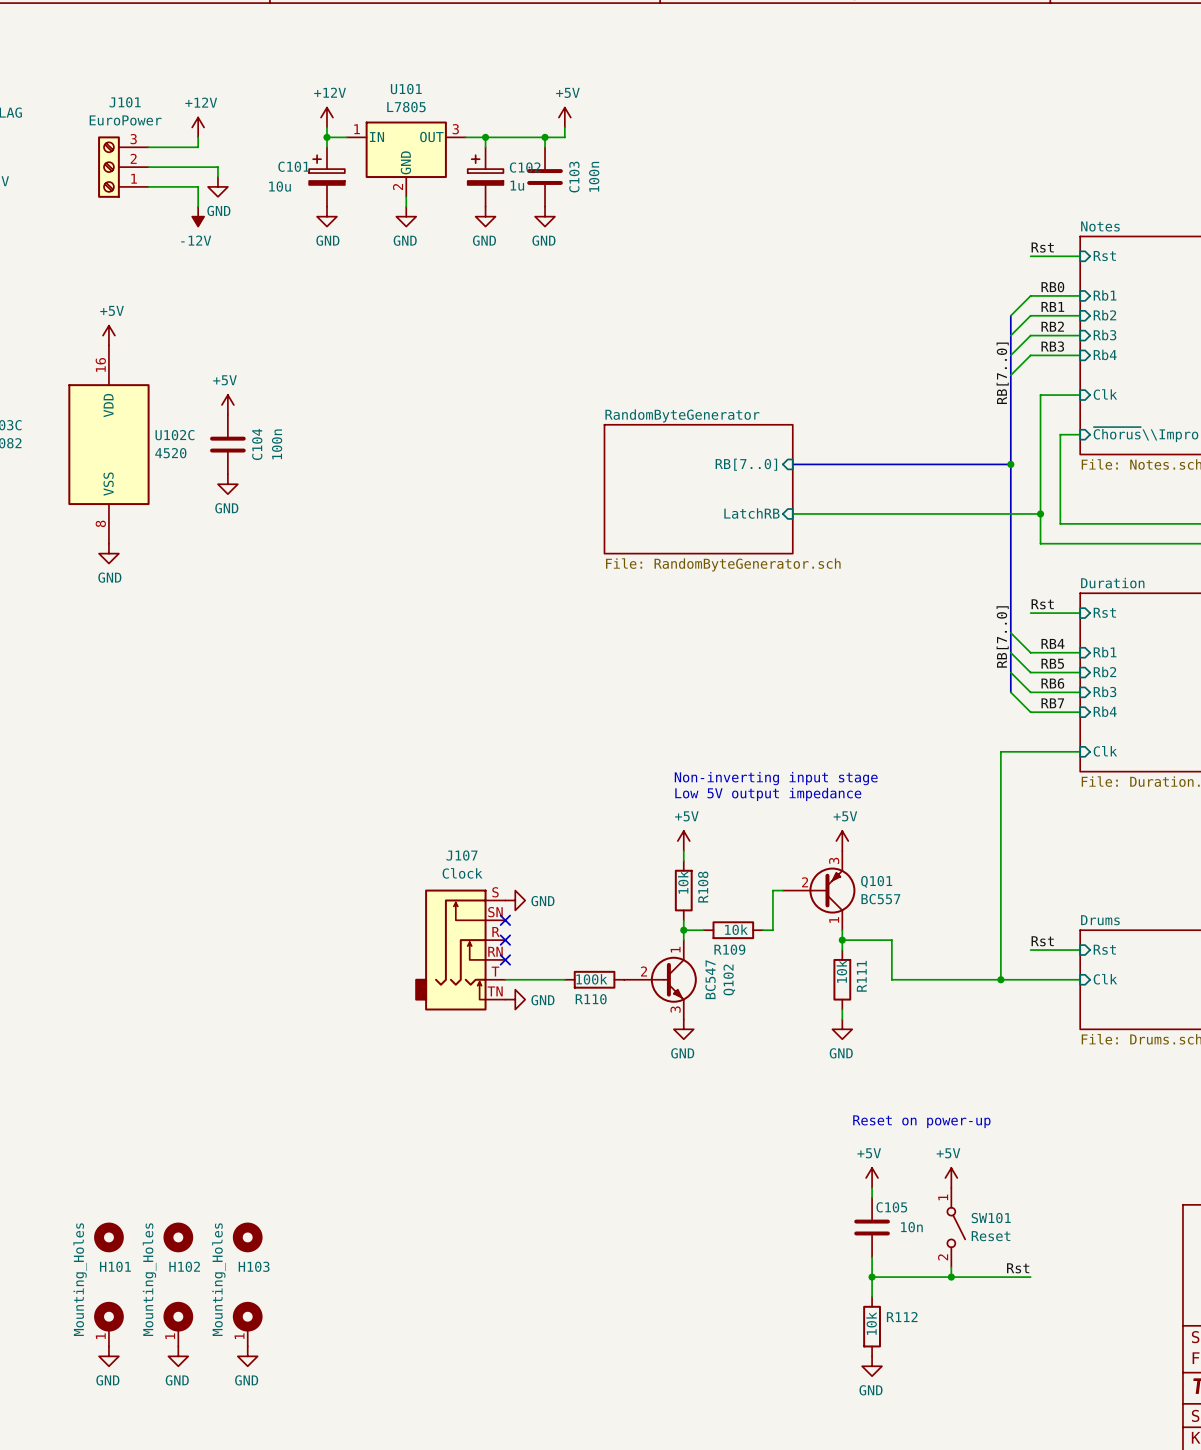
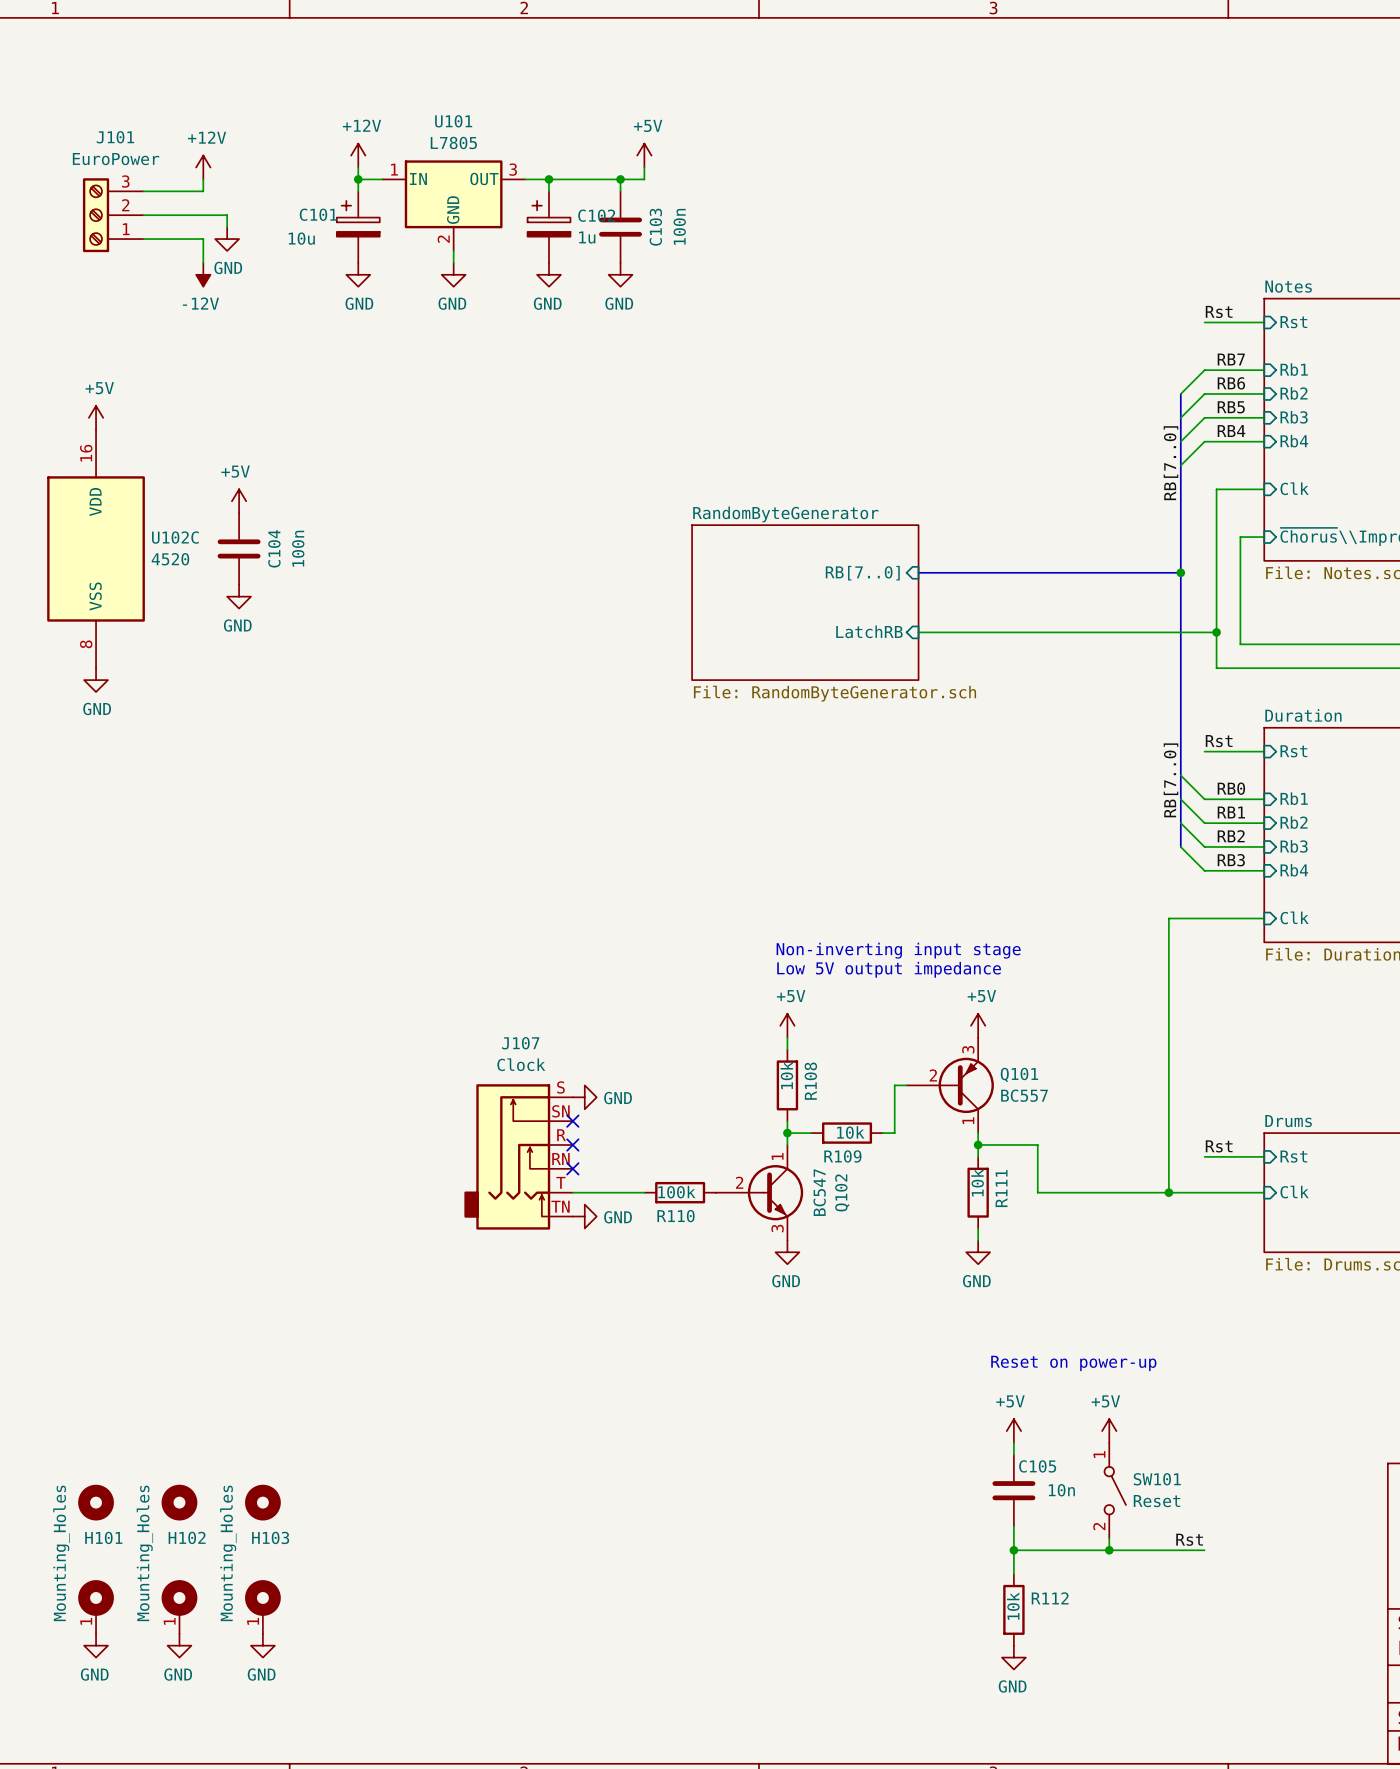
label: RB0 (1052, 287) -> RB7 (1231, 359)
label: RB1 (1052, 306) -> RB6 (1231, 383)
label: RB2 (1052, 326) -> RB5 (1231, 407)
label: RB3 (1052, 346) -> RB4 (1231, 431)
label: RB4 (1052, 643) -> RB0 (1231, 788)
label: RB5 (1052, 663) -> RB1 (1231, 812)
label: RB6 (1052, 683) -> RB2 (1231, 836)
label: RB7 (1052, 703) -> RB3 (1231, 860)

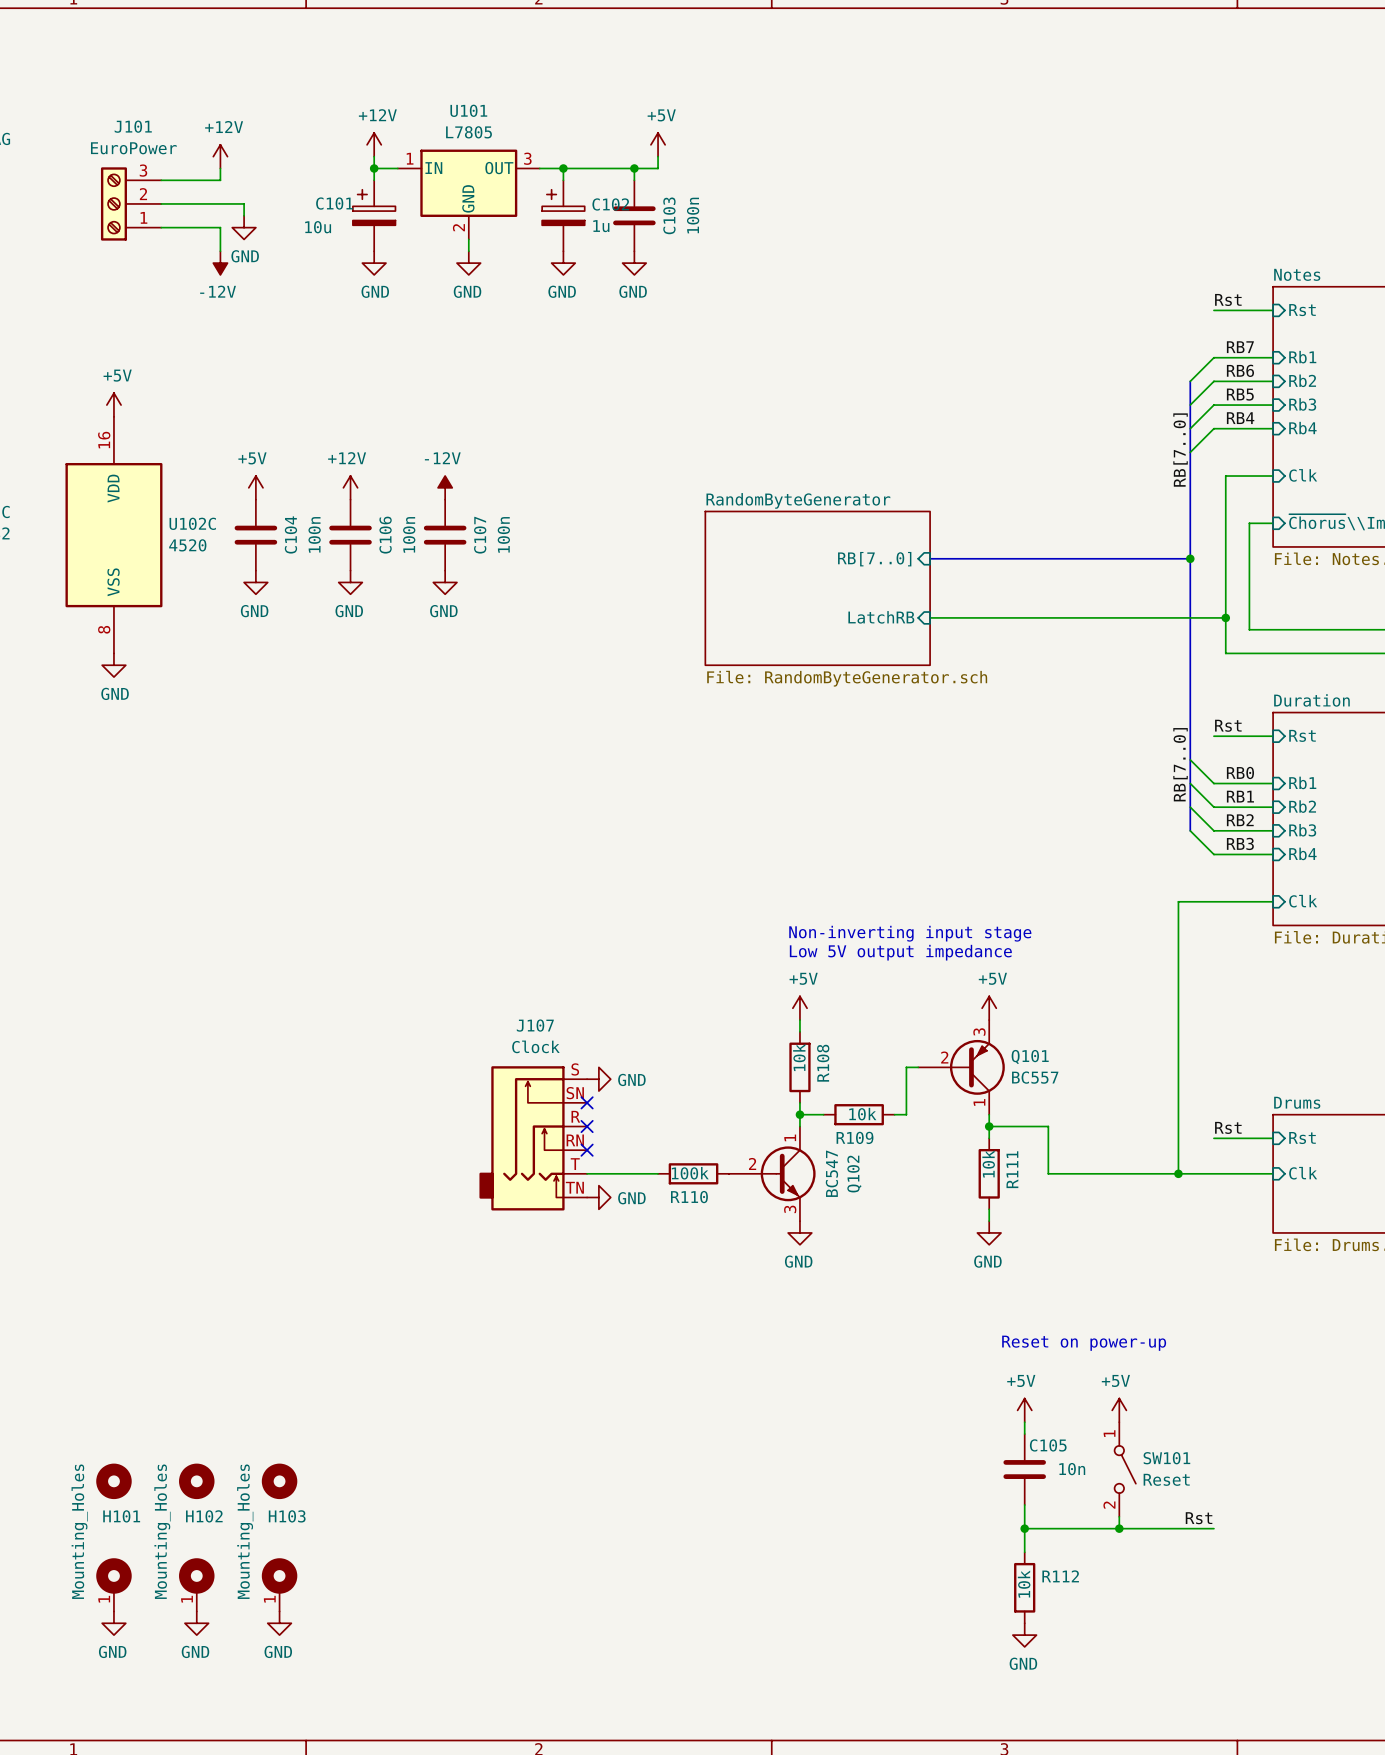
power symbol: none -> +12V (350, 487)
power symbol: none -> -12V (445, 487)
C106: none -> 100n (350, 535)
C107: none -> 100n (445, 535)
power symbol: none -> GND (350, 582)
power symbol: none -> GND (445, 582)

